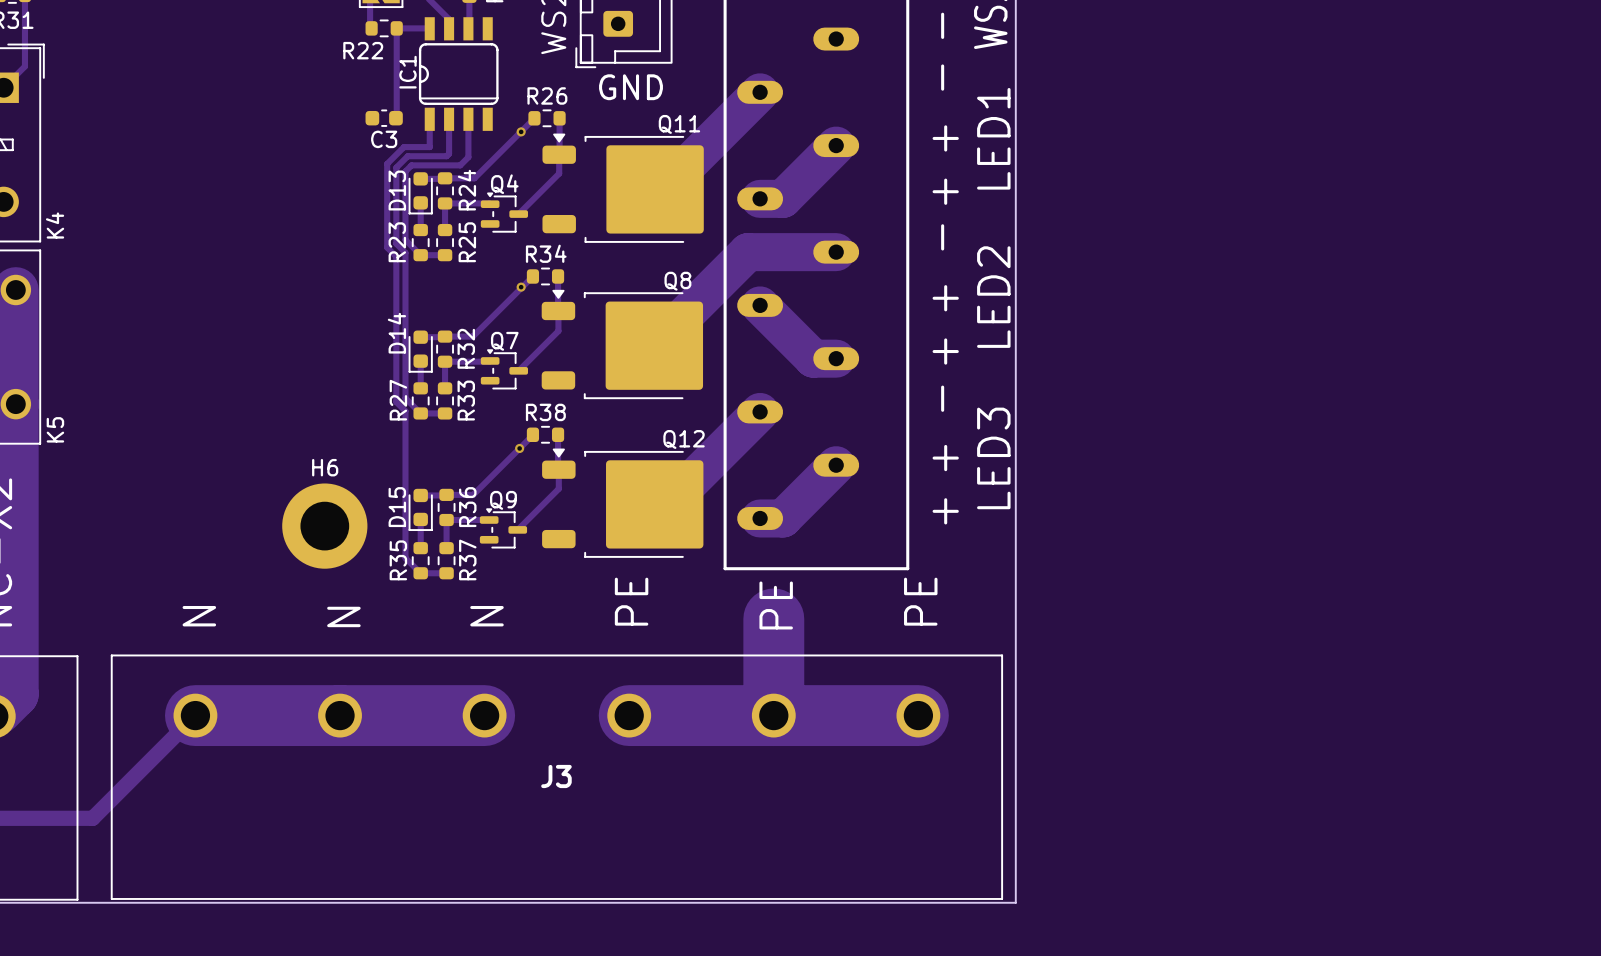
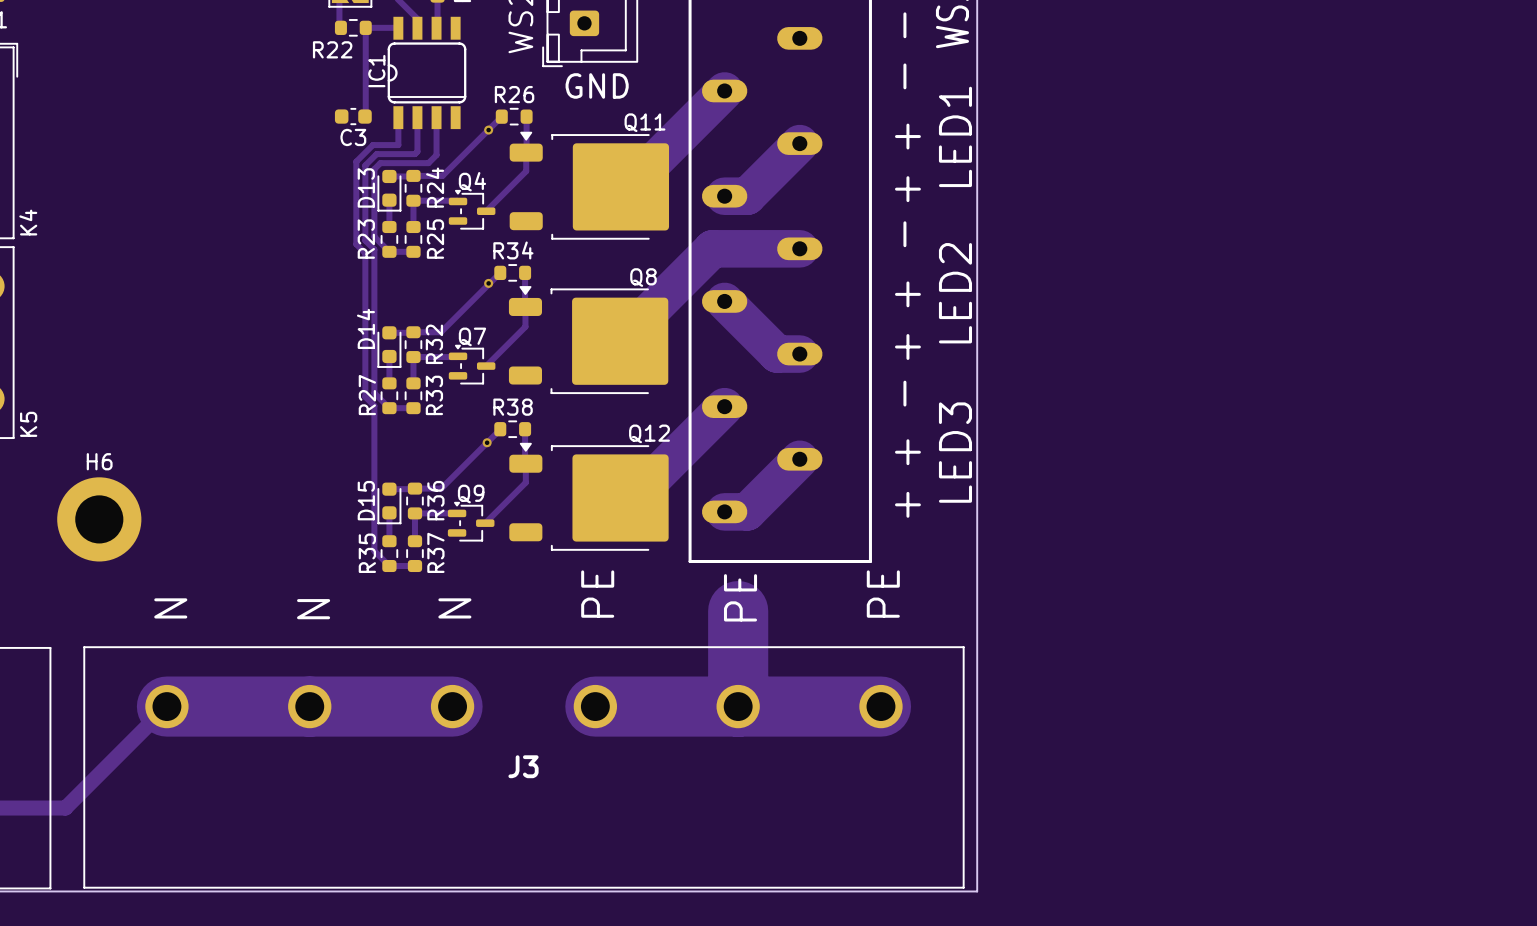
H6 position: (324, 526) -> (99, 519)

